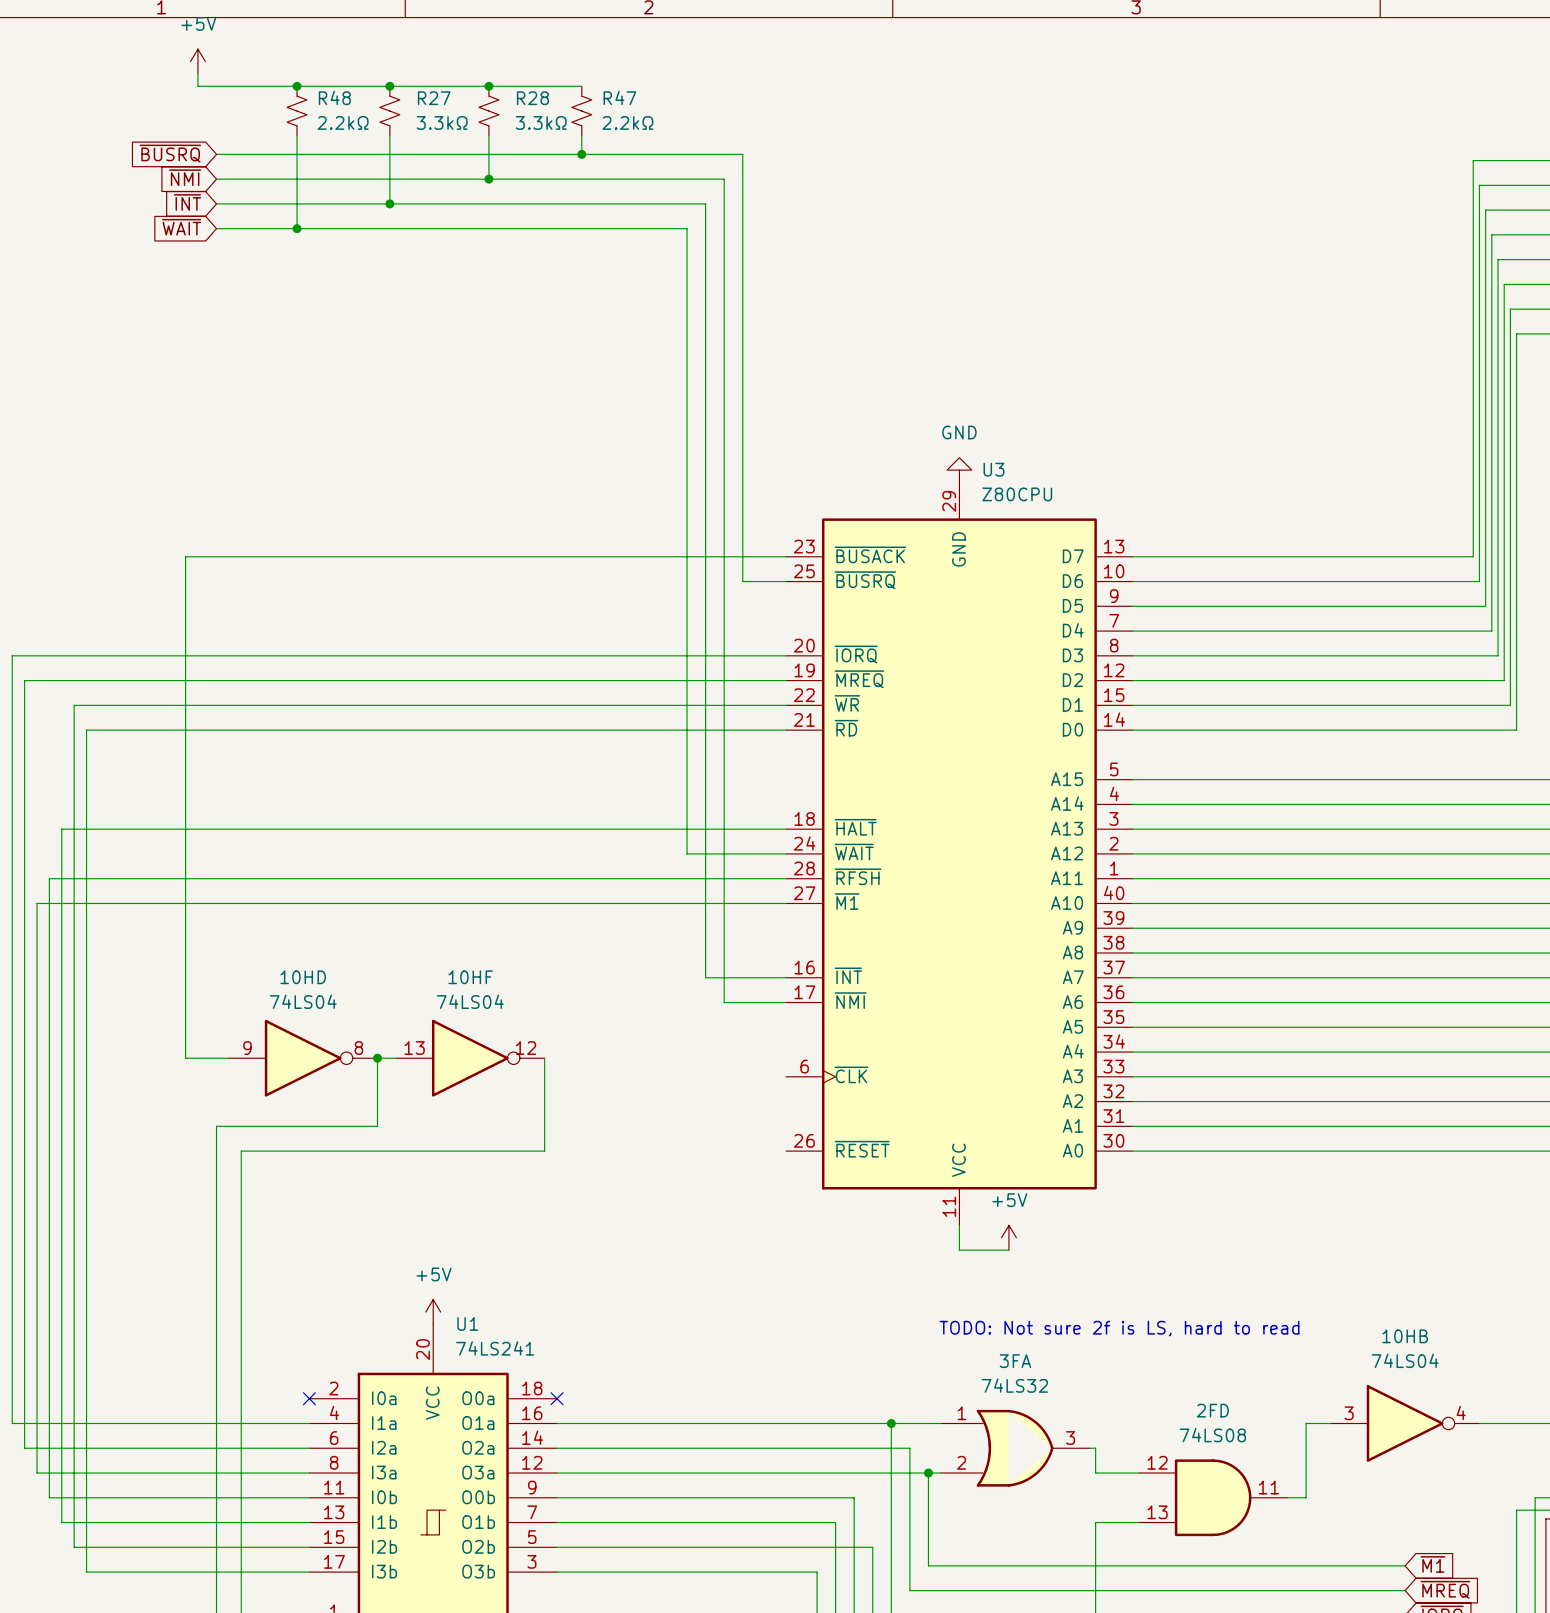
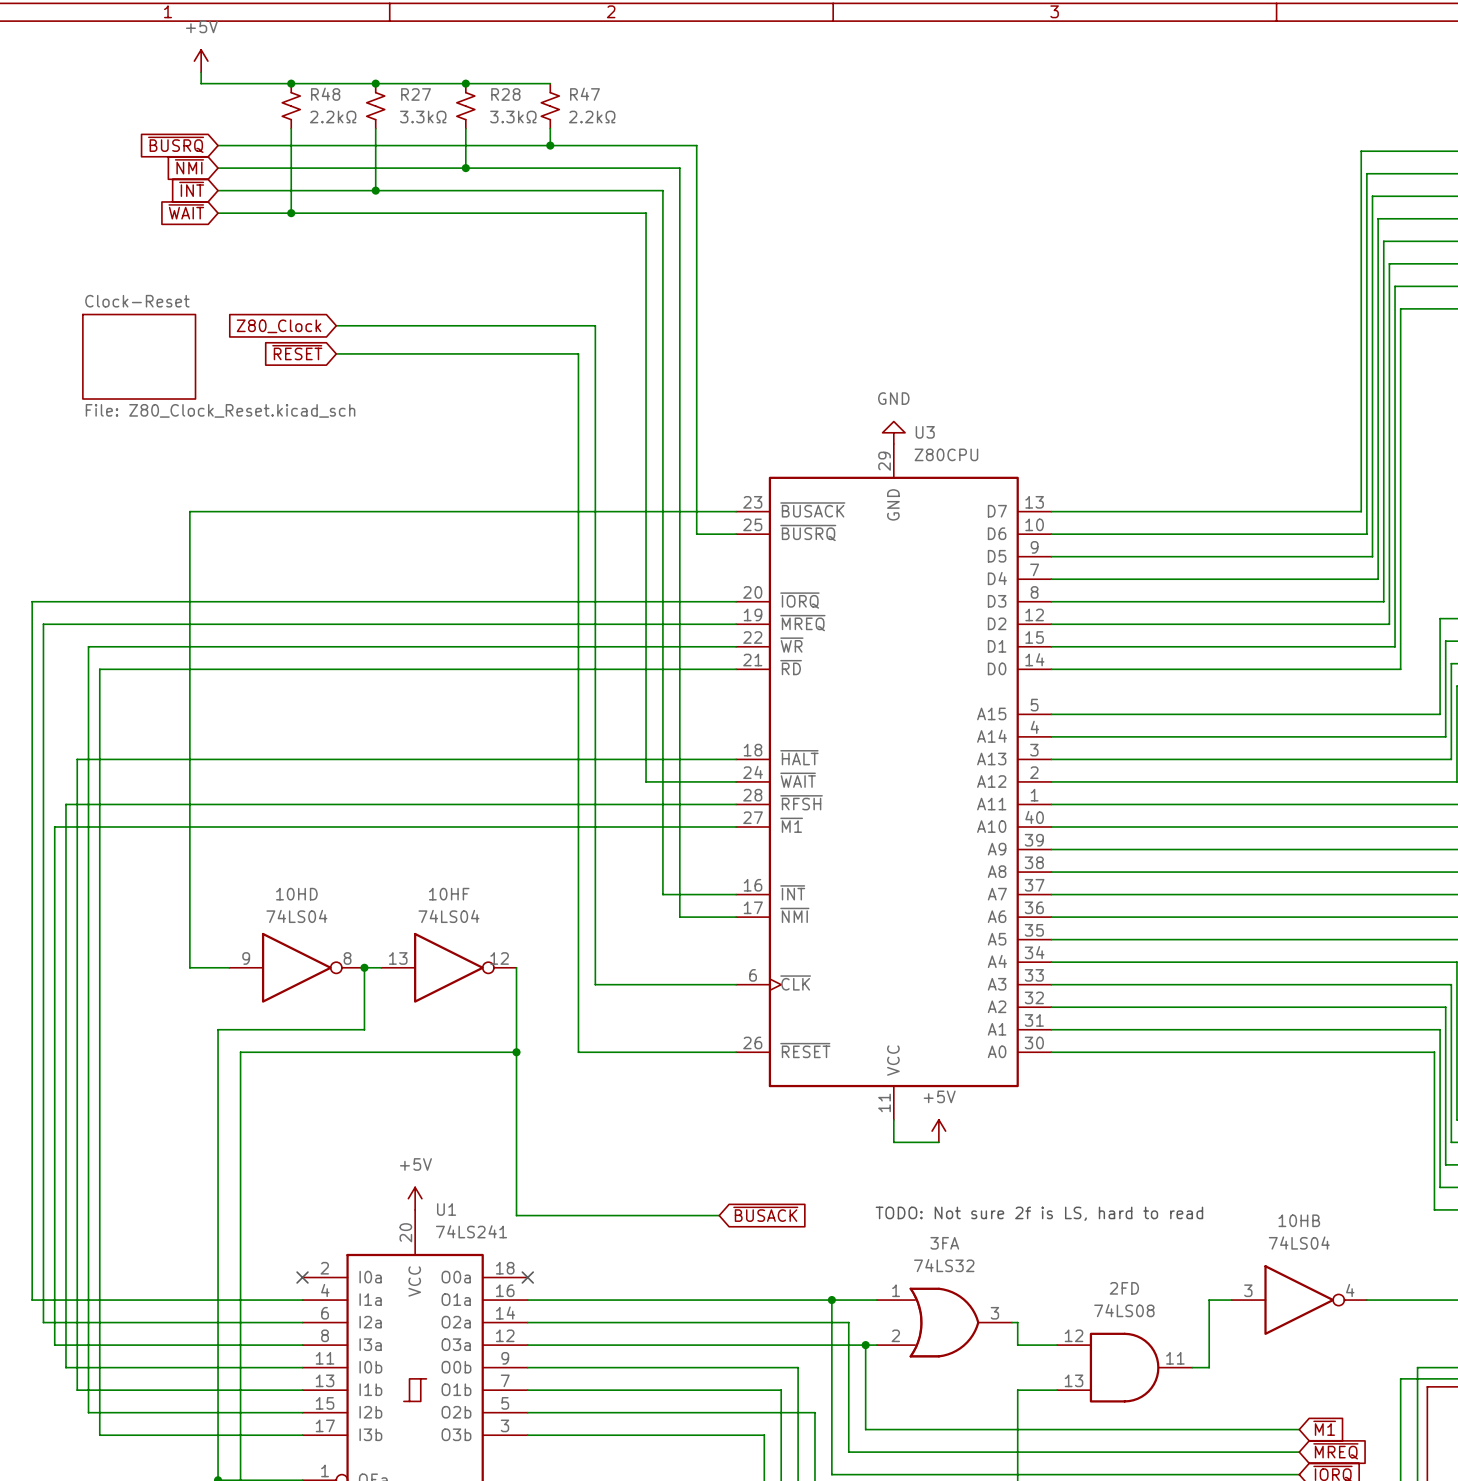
wire: none -> (336, 325) (595, 325) (595, 984) (736, 984)
global label: none -> Z80_Clock (279, 326)
global label: none -> ~{RESET} (297, 352)
wire: none -> (336, 353) (578, 353) (578, 1052) (736, 1052)
sheet Clock-Reset: none -> File: Z80_Clock_Reset.kicad_sch (139, 356)
wire: none -> (516, 1052) (516, 1215) (719, 1215)
junction: none -> (516, 1052)
global label: none -> ~{BUSACK} (765, 1214)

